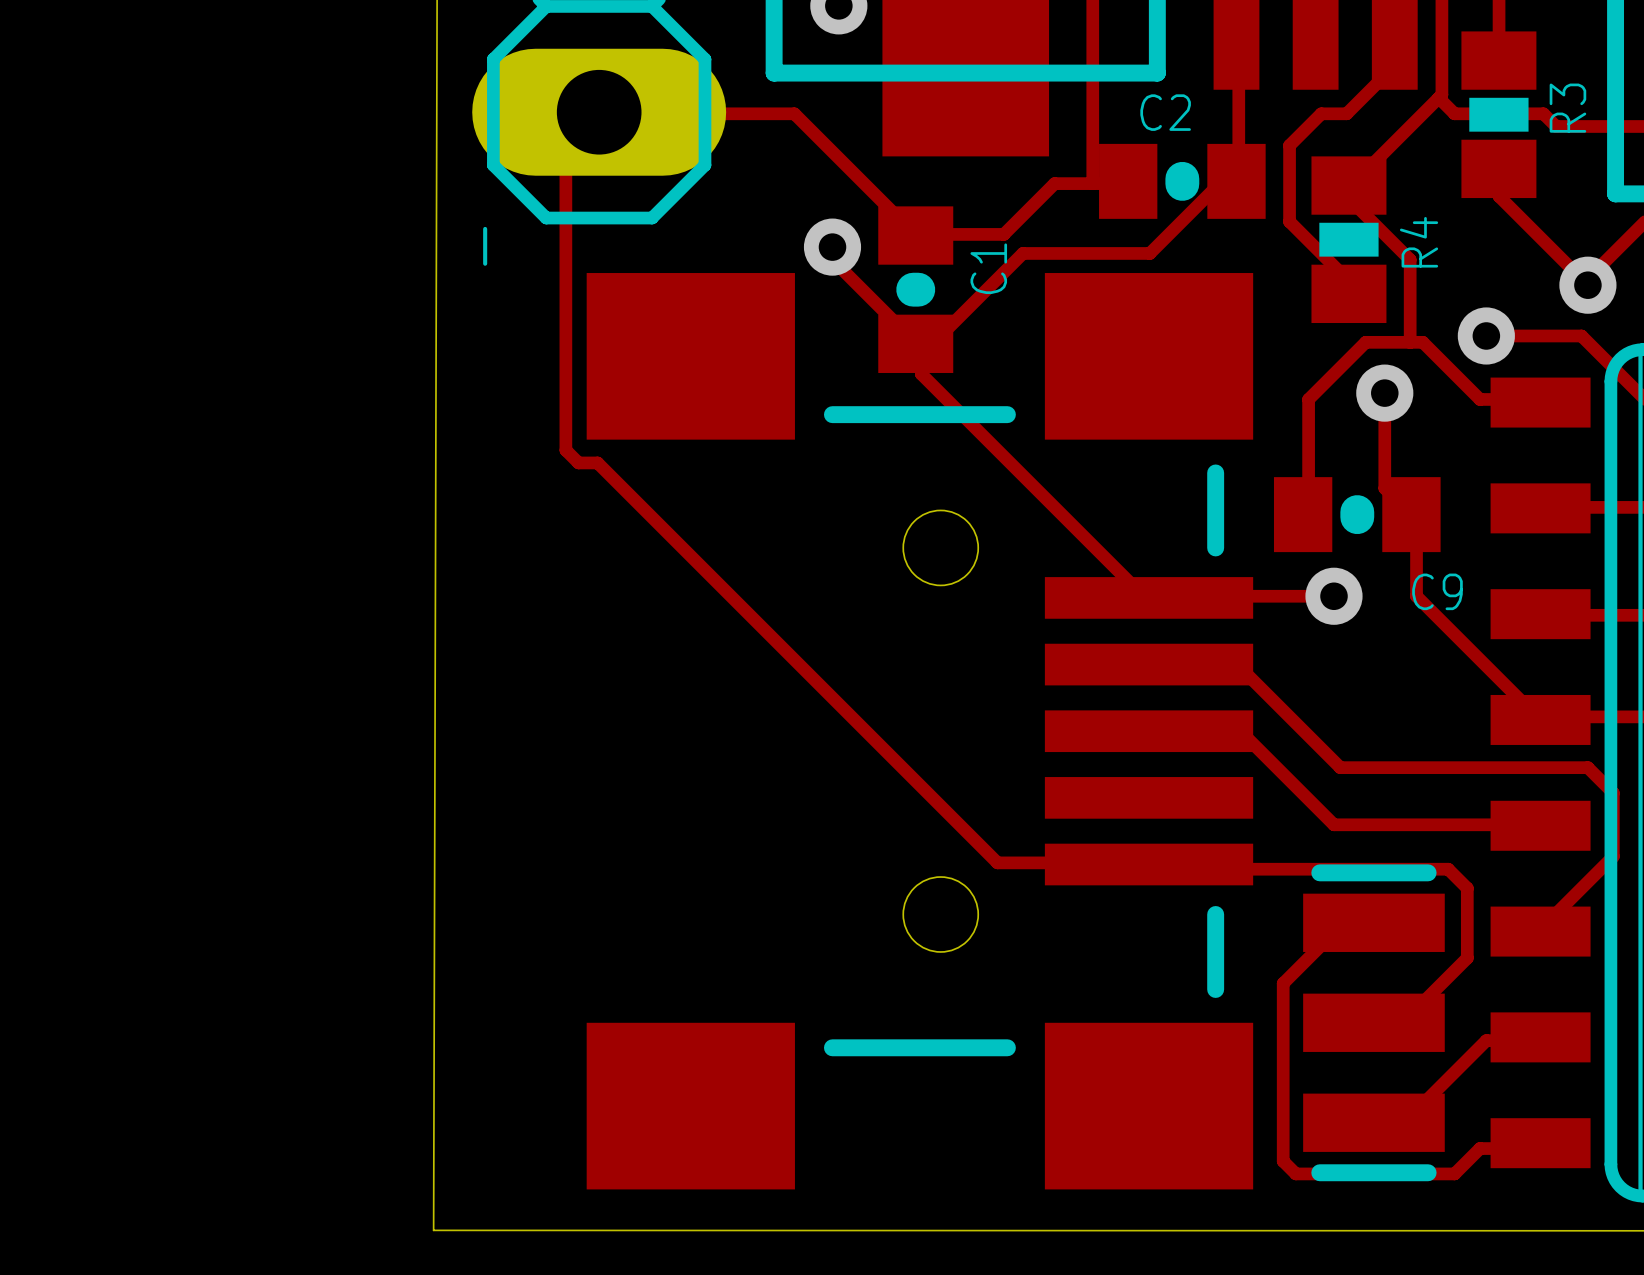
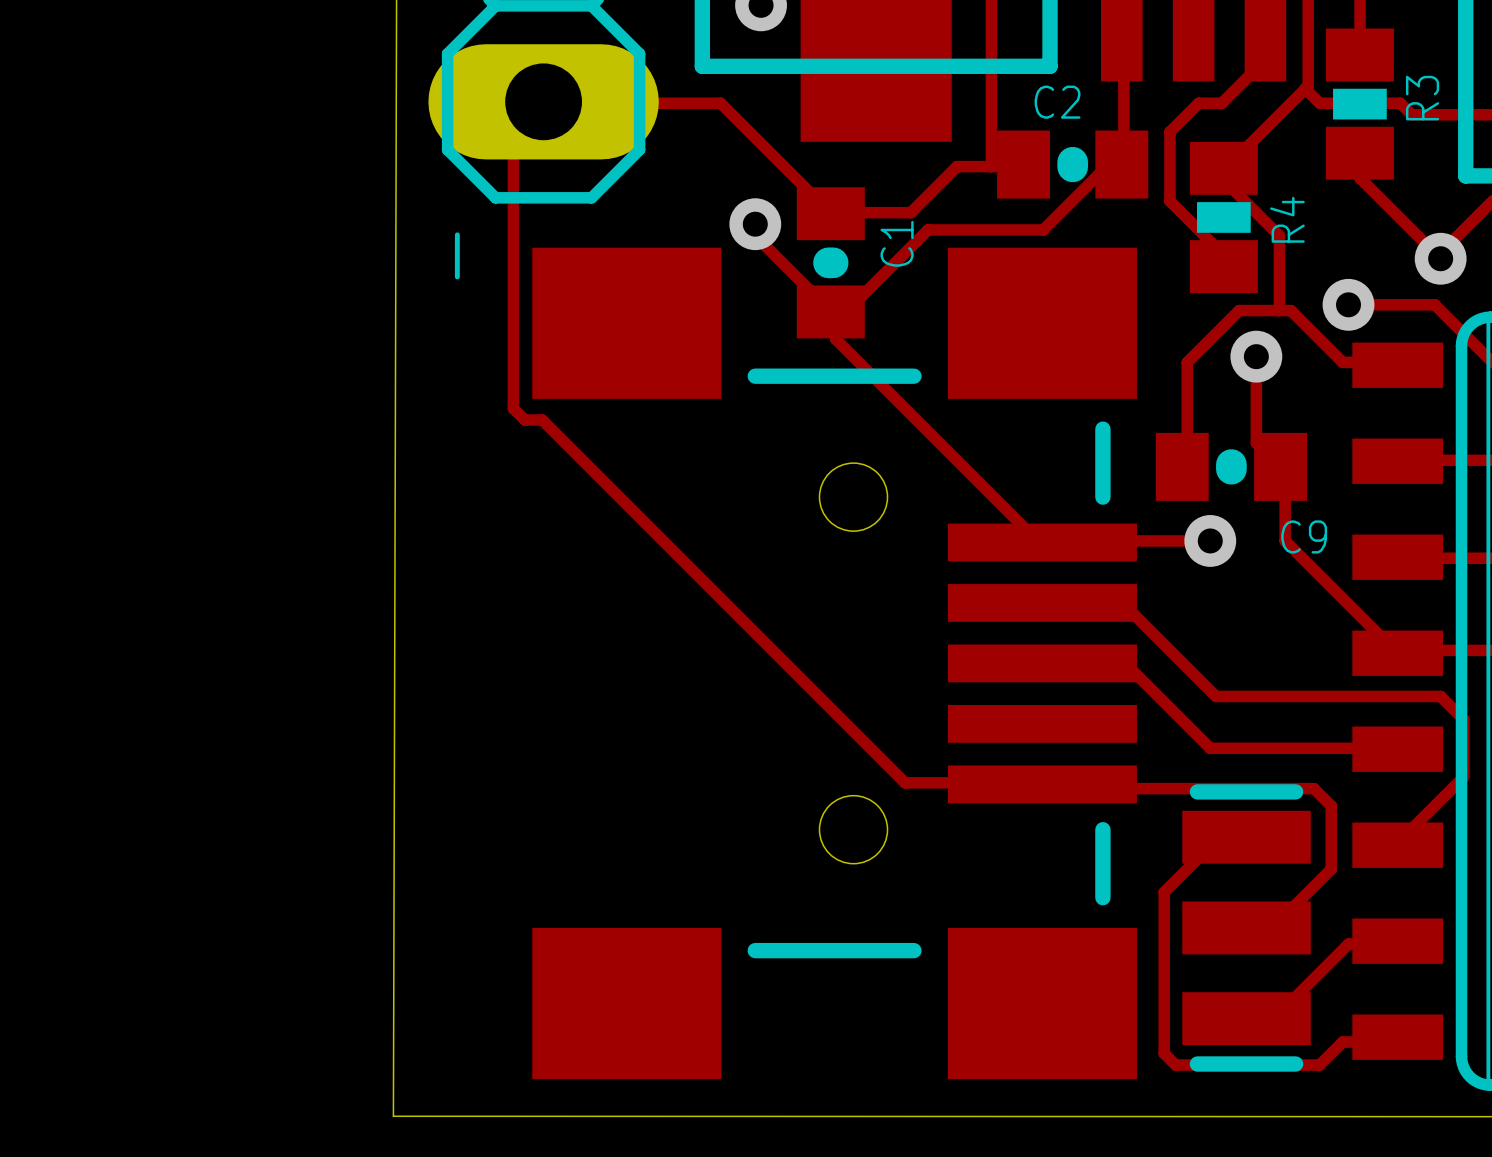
text position: - (485, 246) -> - (457, 255)

